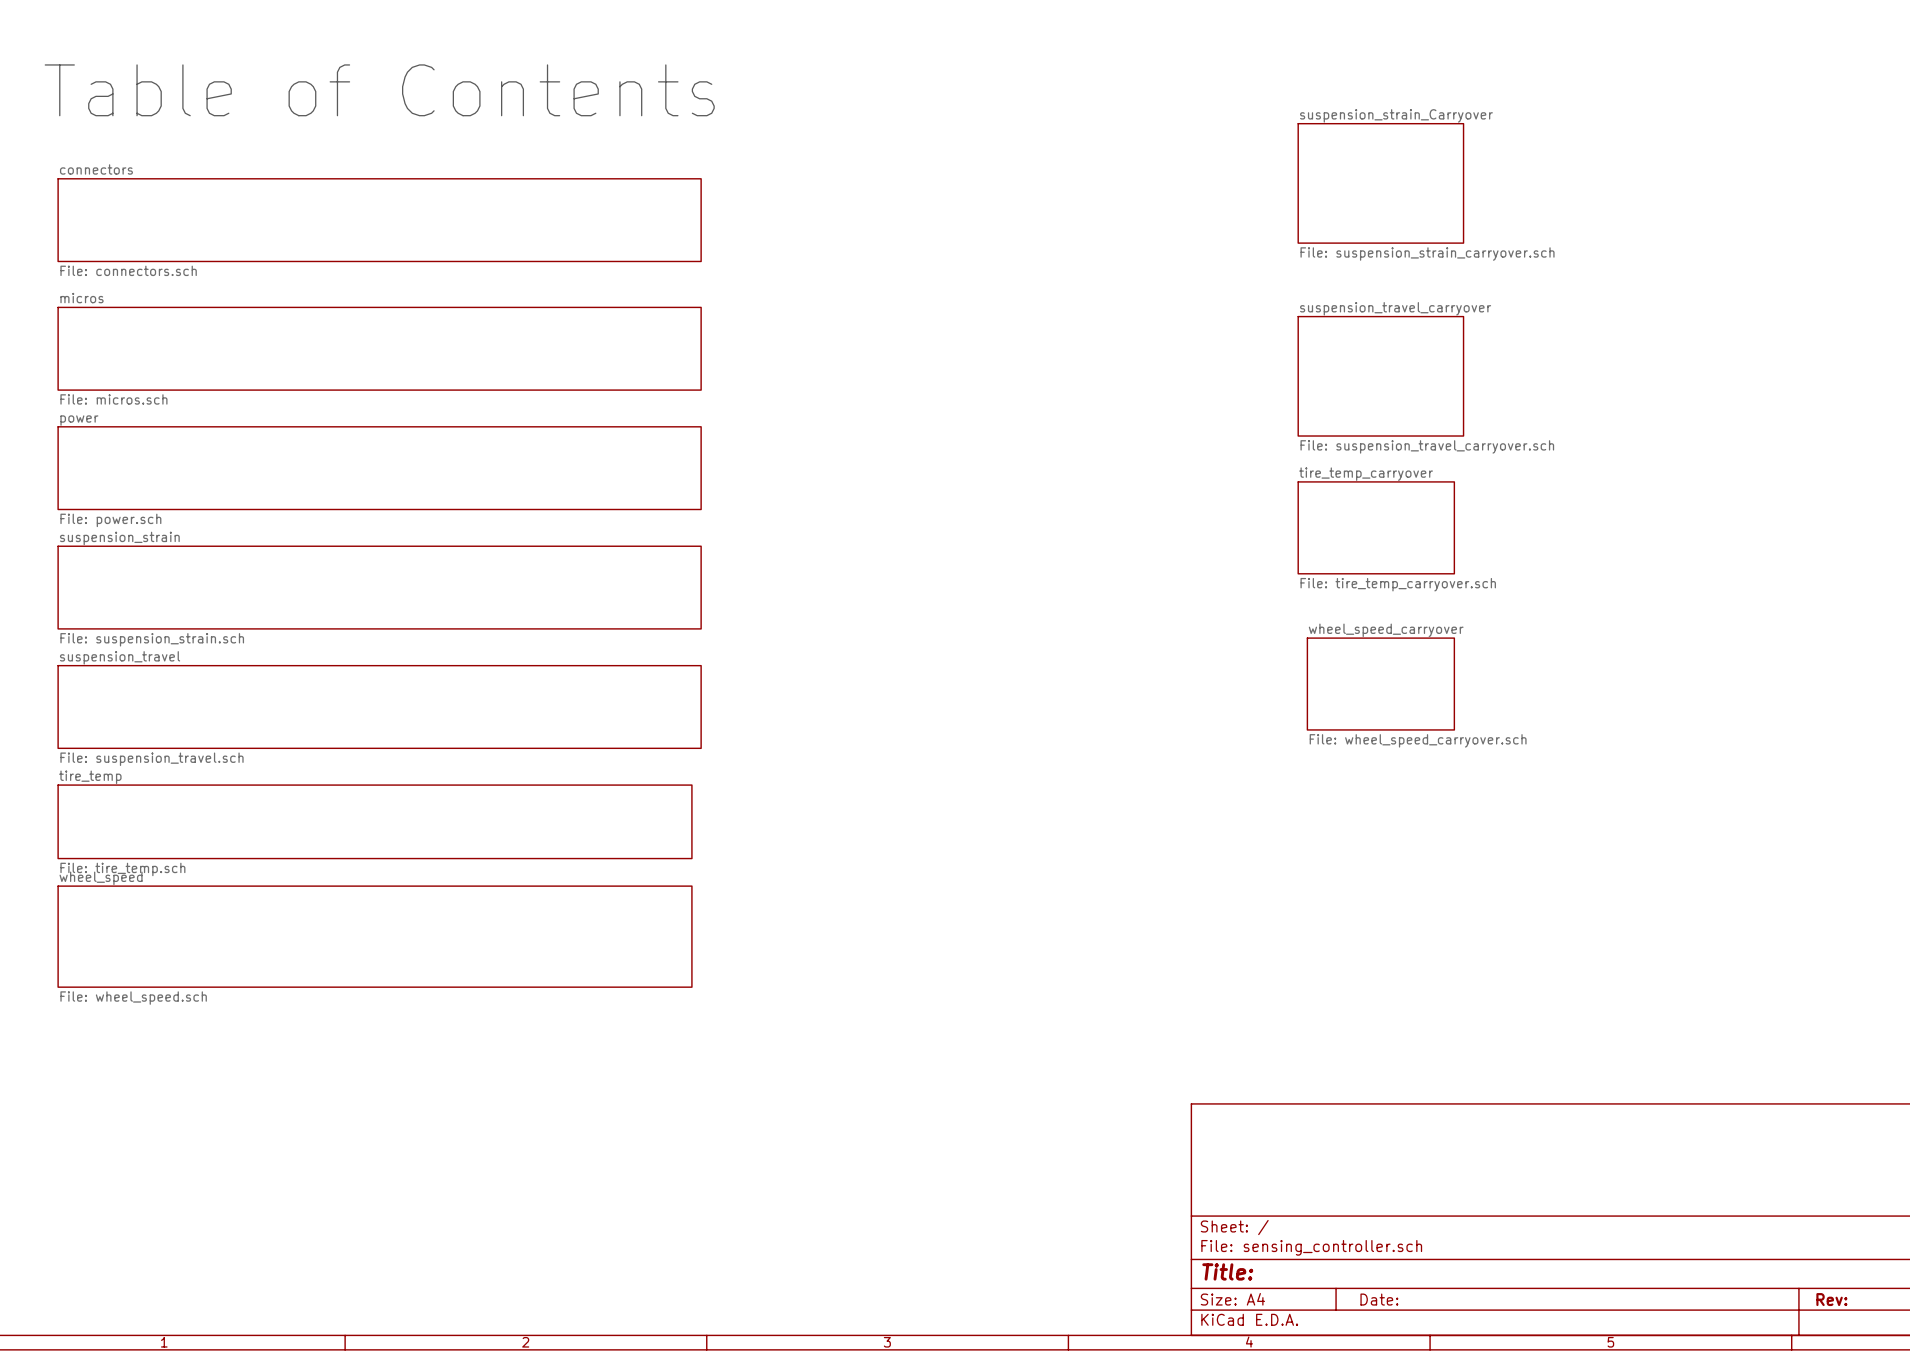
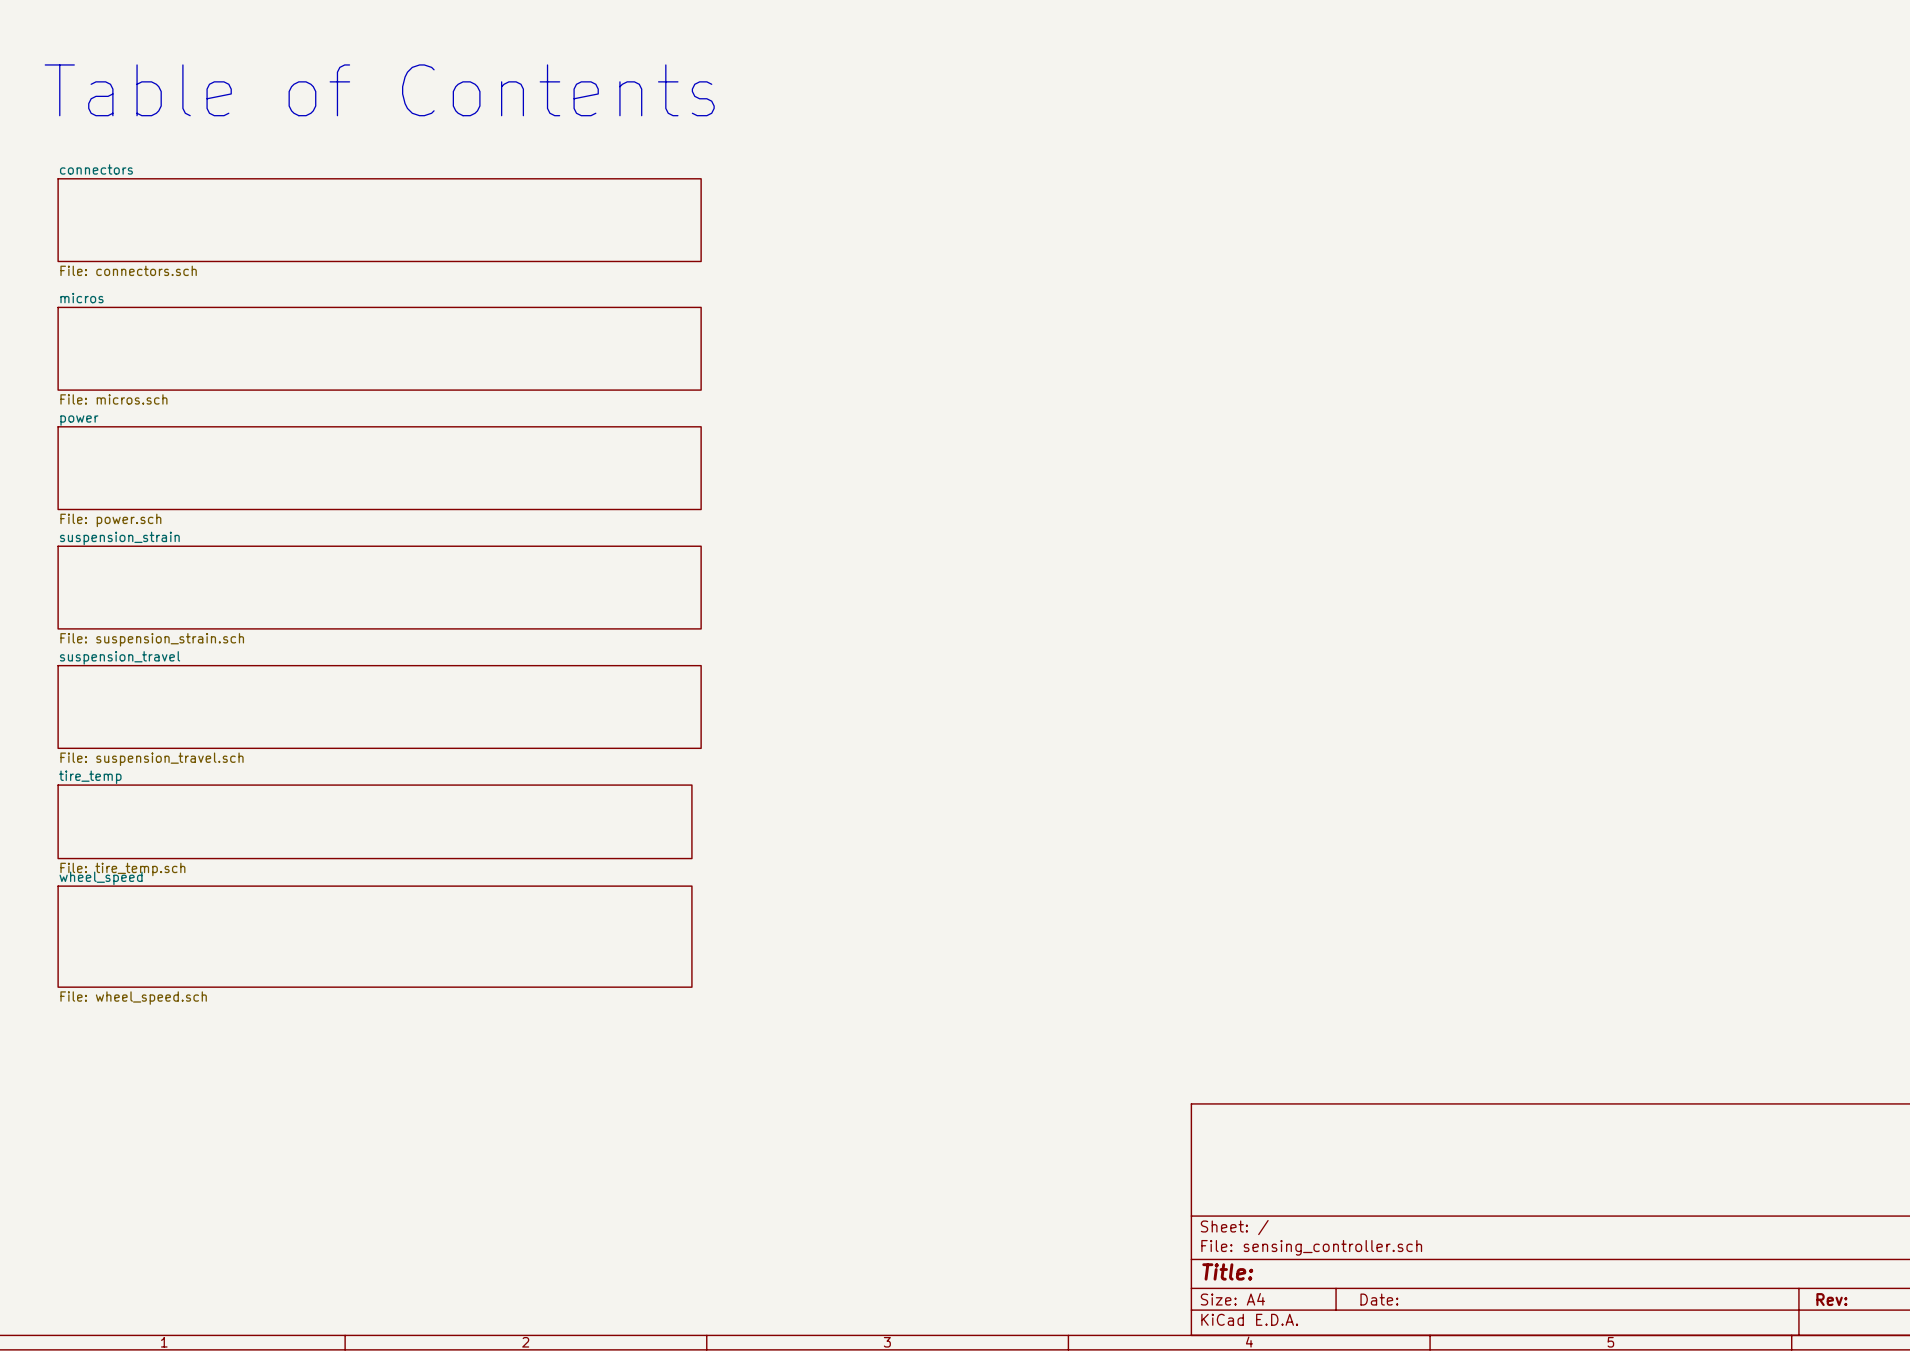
sheet suspension_strain_Carryover: File: suspension_strain_carryover.sch (1380, 183) -> none
sheet suspension_travel_carryover: File: suspension_travel_carryover.sch (1380, 376) -> none
sheet tire_temp_carryover: File: tire_temp_carryover.sch (1376, 527) -> none
sheet wheel_speed_carryover: File: wheel_speed_carryover.sch (1380, 684) -> none

